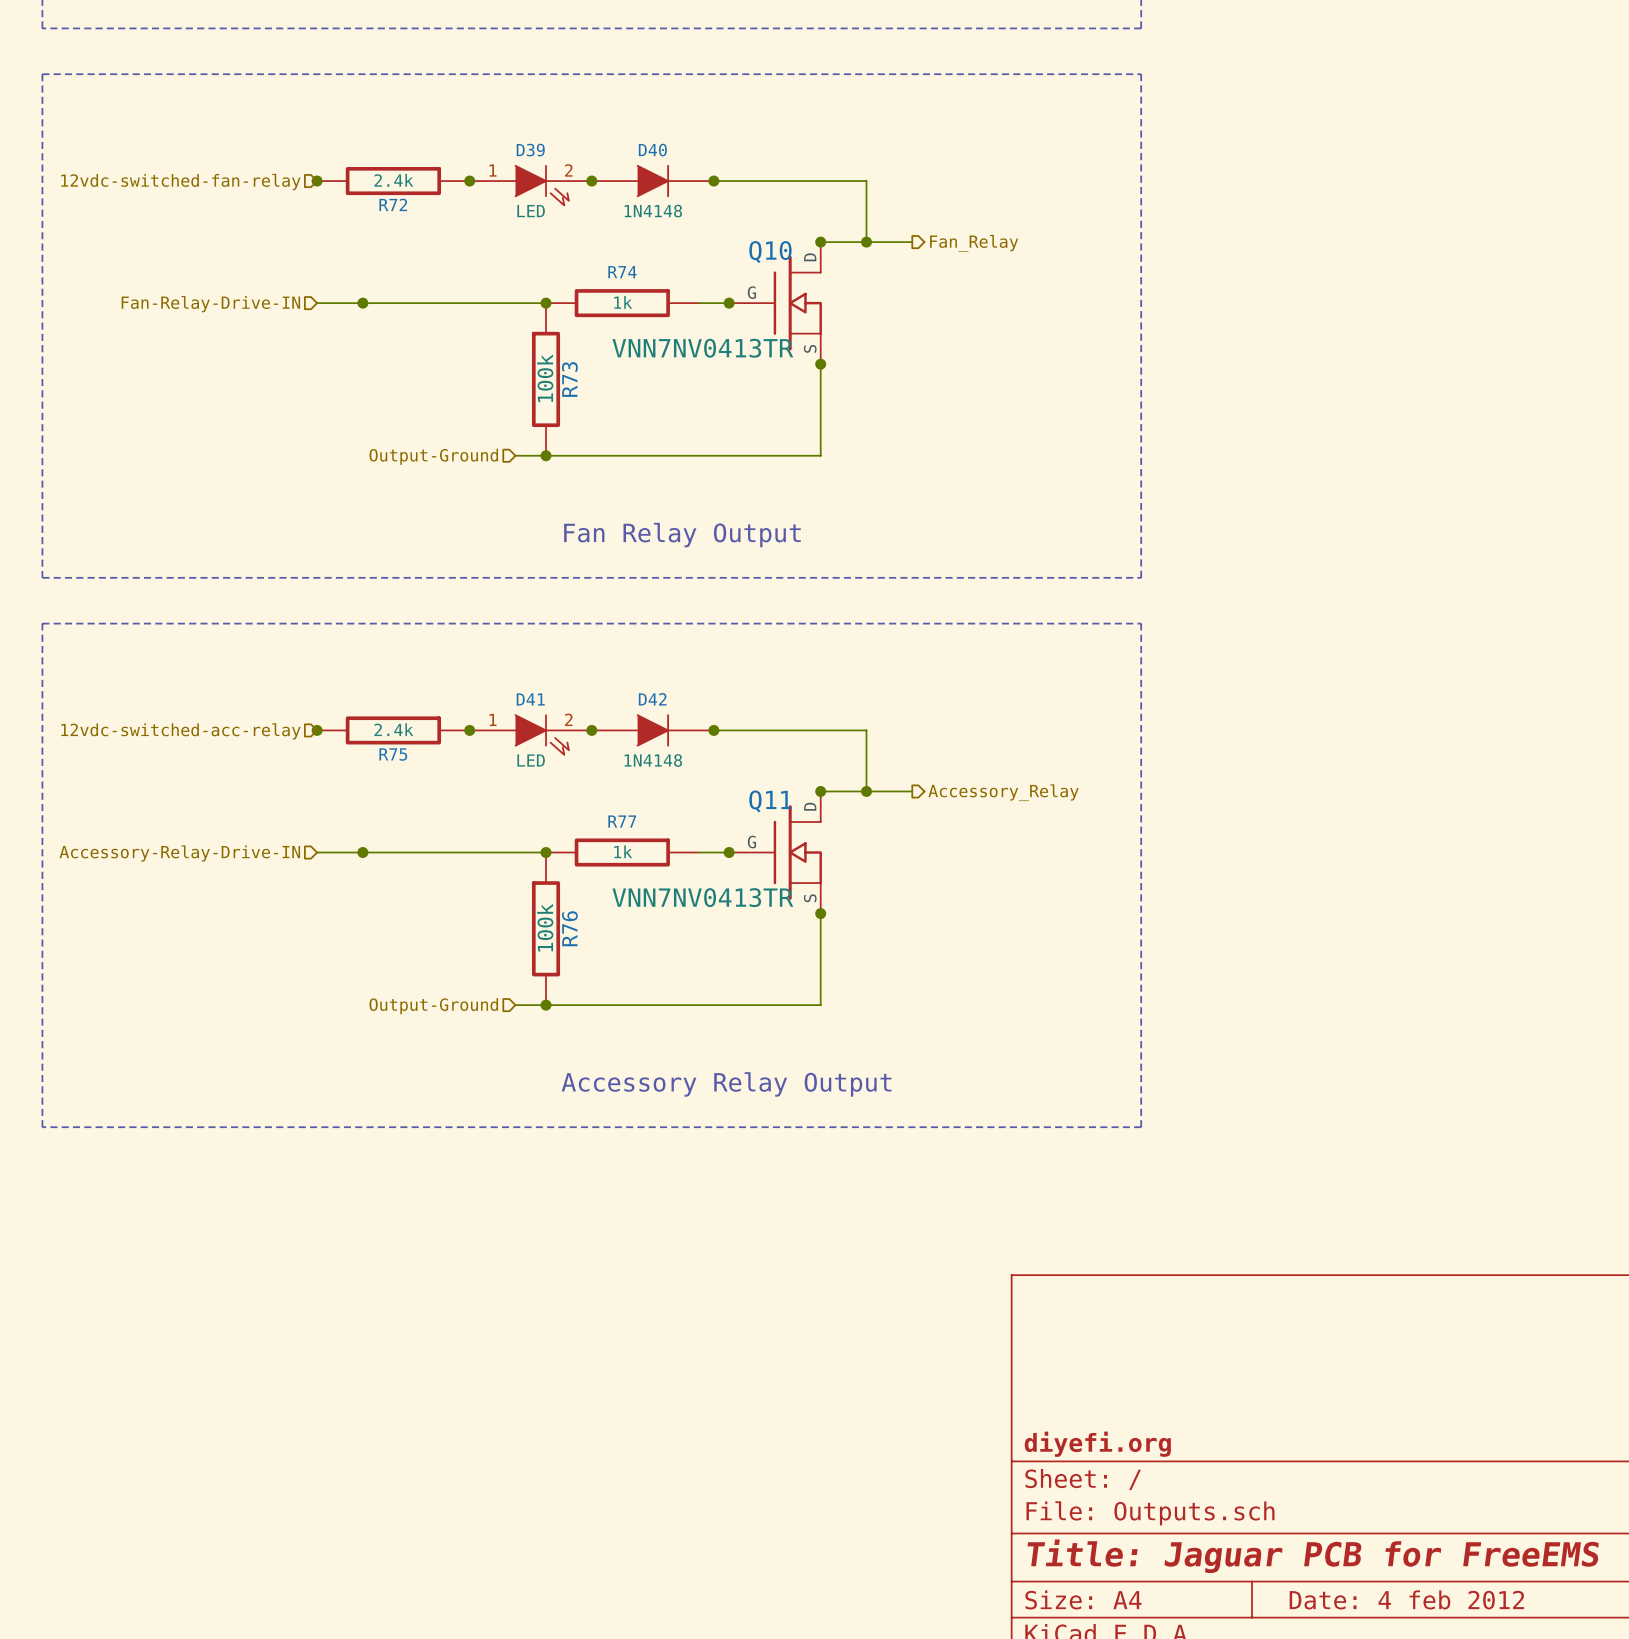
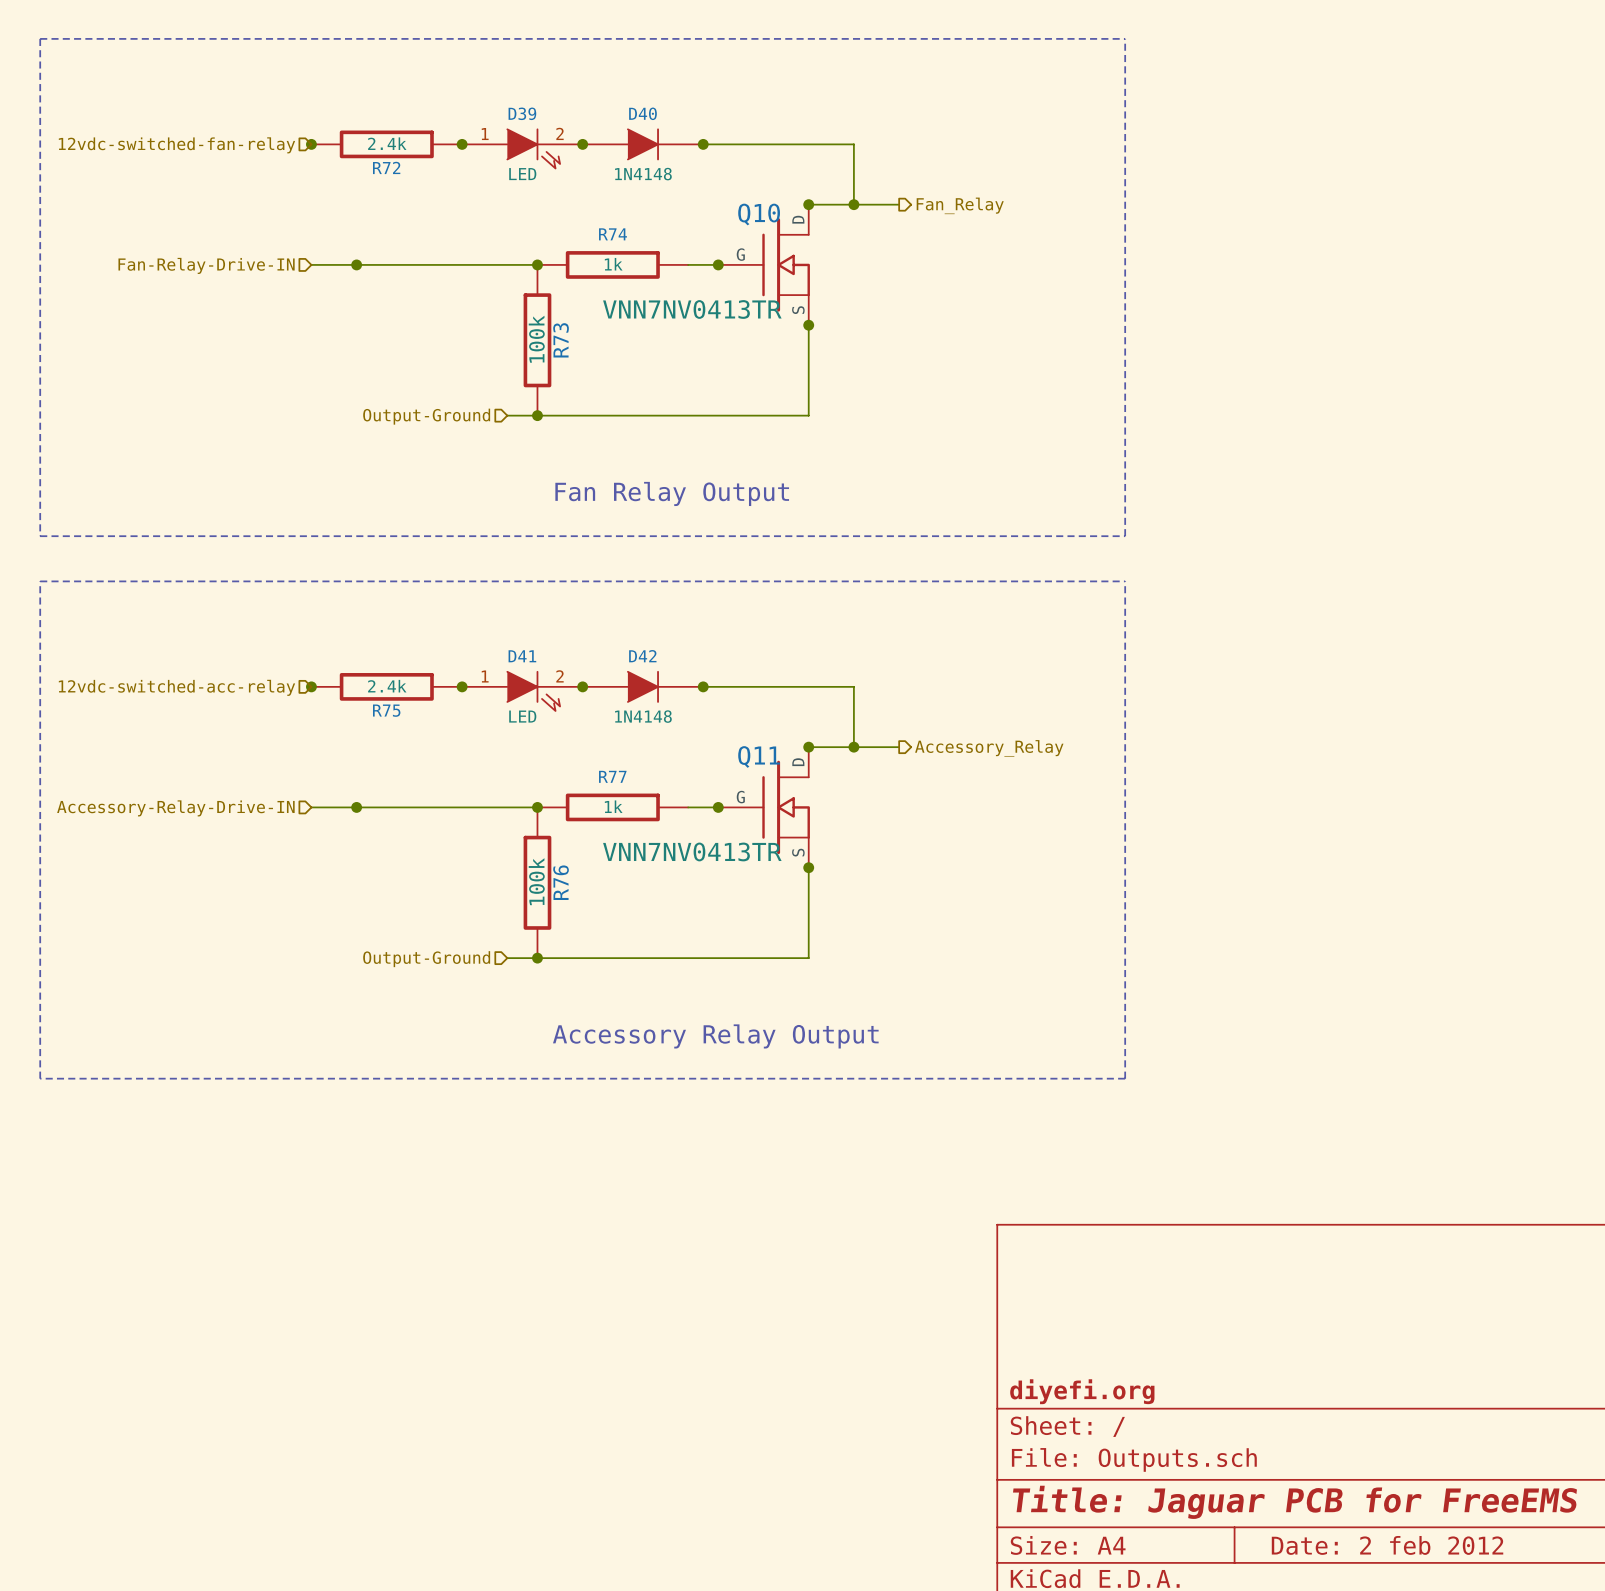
title block: Date: 4 feb 2012 (1406, 1599) -> Date: 2 feb 2012 (1387, 1545)

